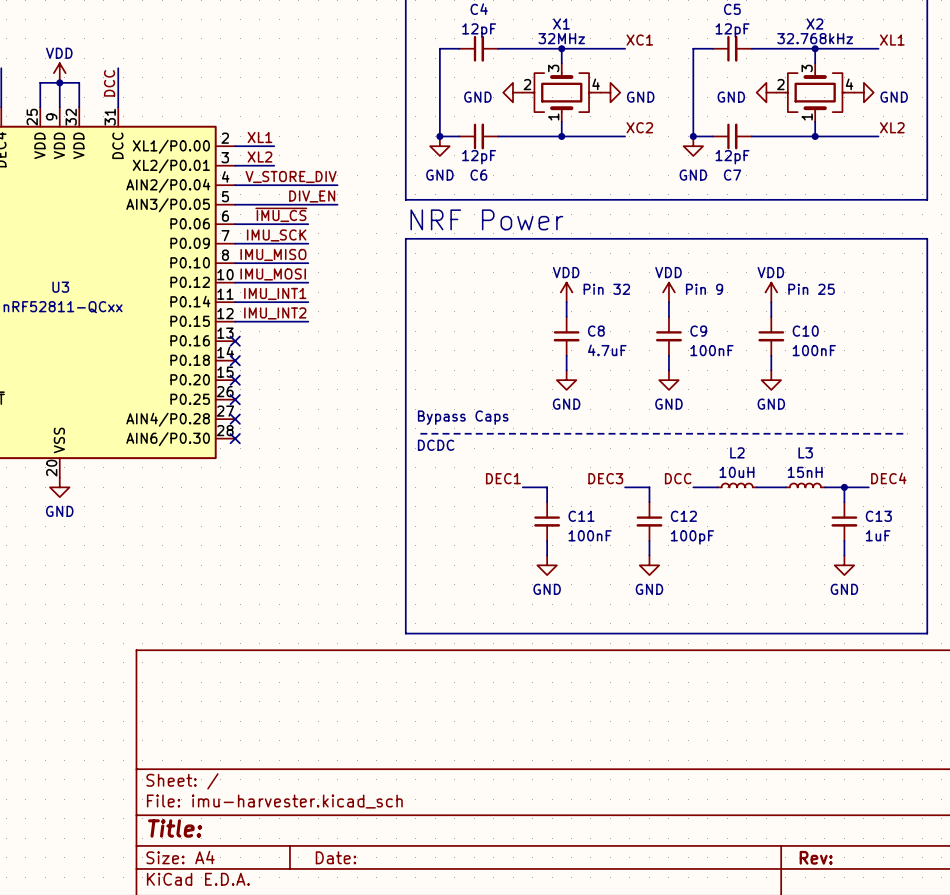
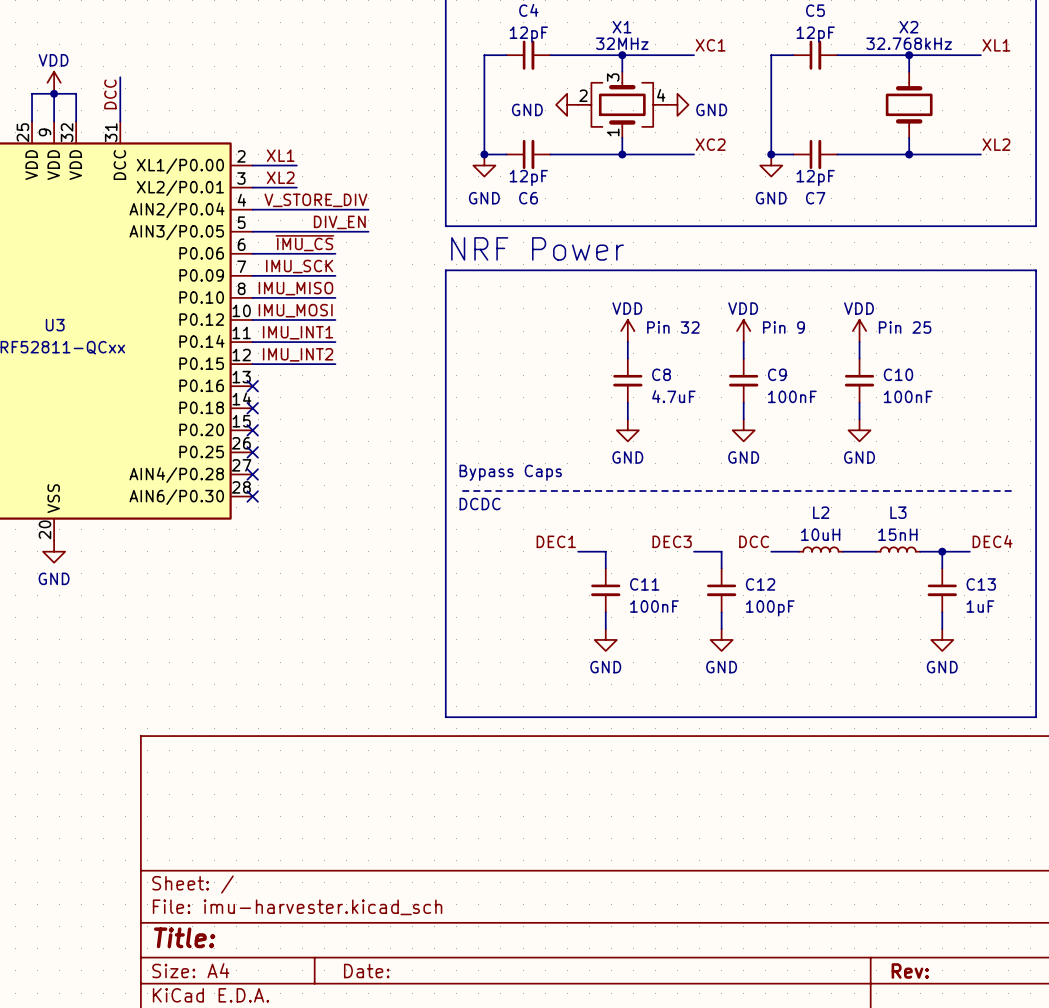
X2 symbol: [776, 63, 855, 122] -> [885, 71, 933, 138]
power symbol: GND (766, 92) -> none
power symbol: GND (863, 92) -> none

